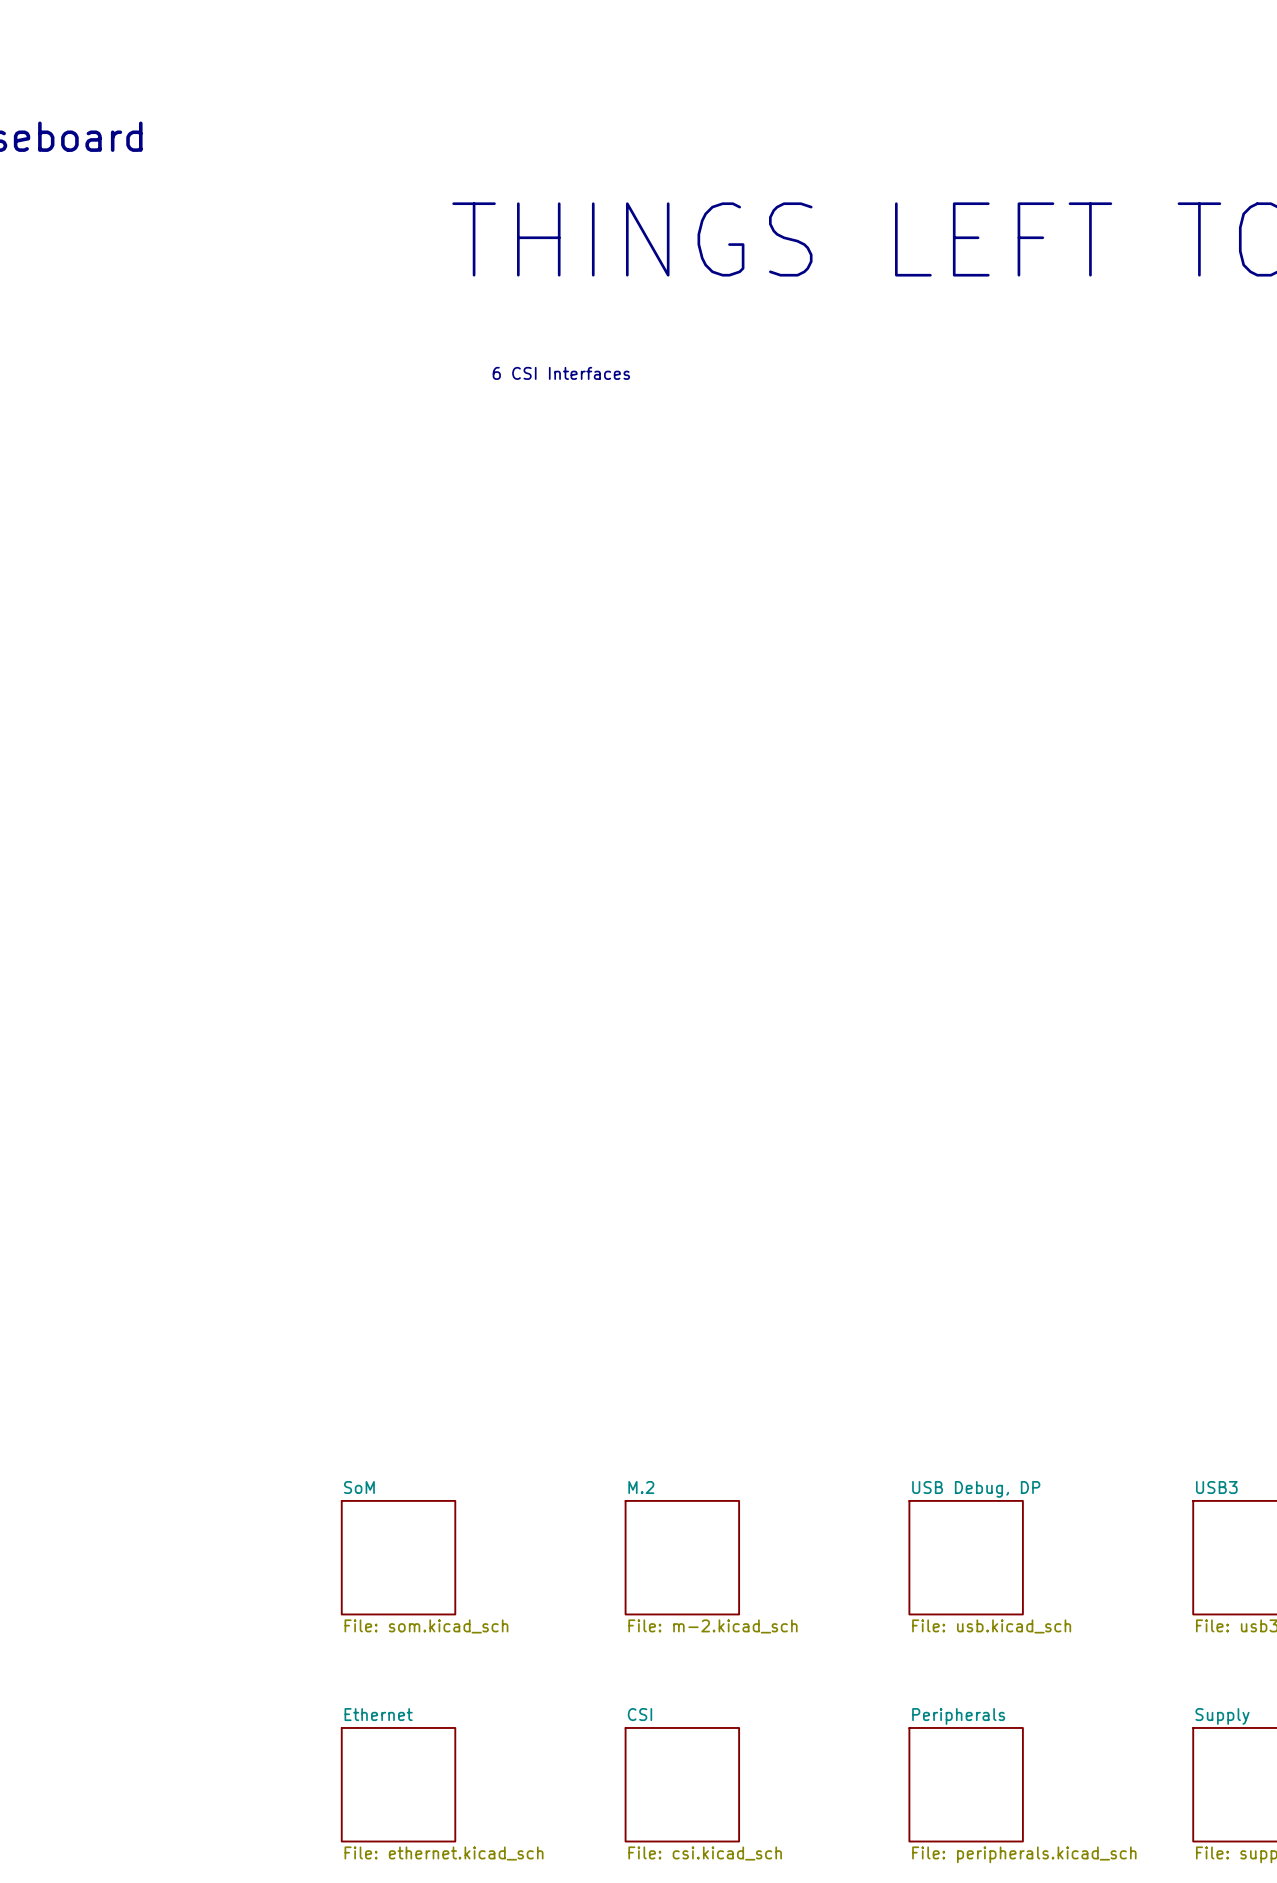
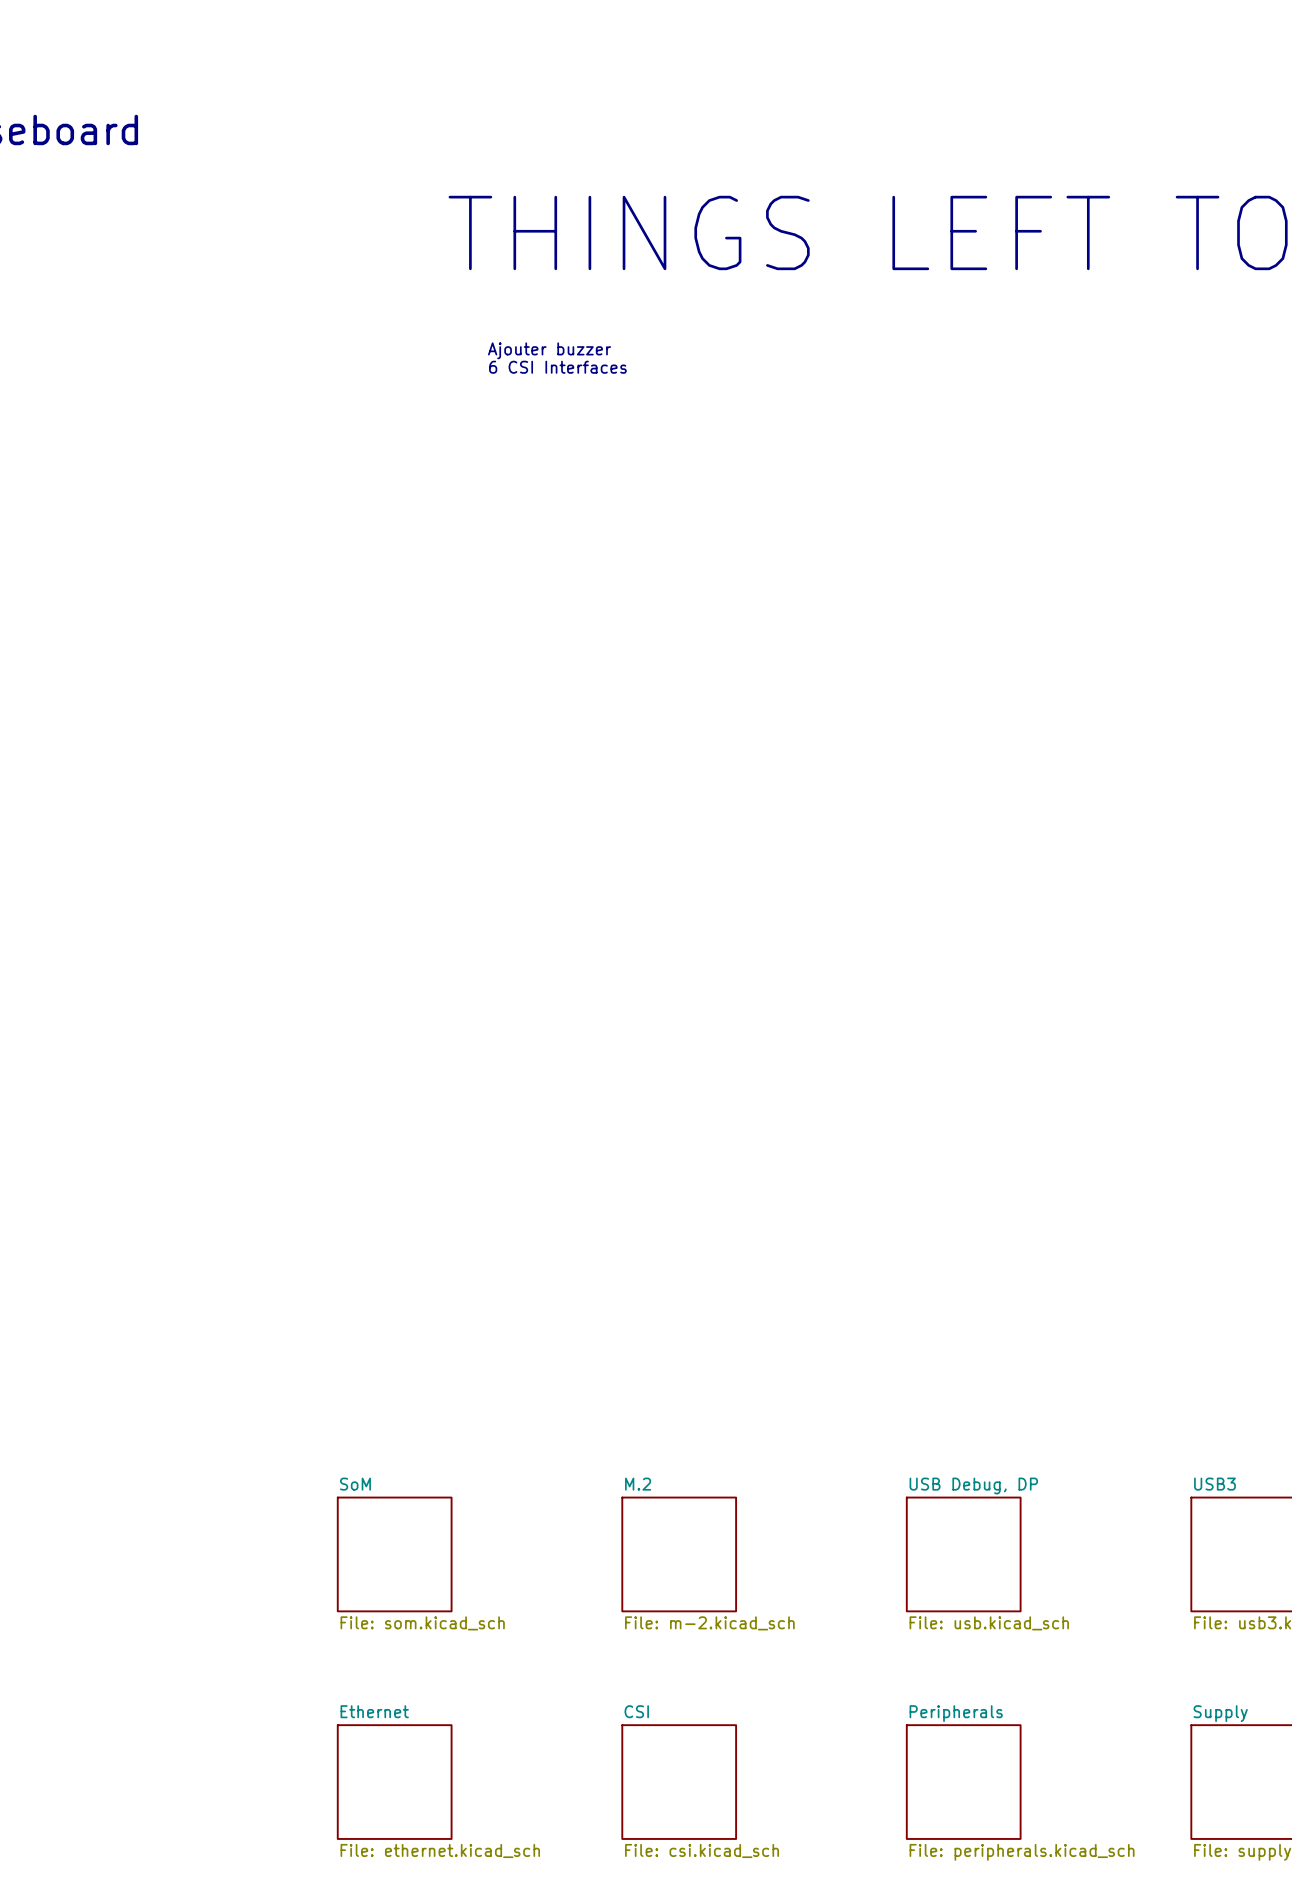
text: none -> Ajouter buzzer (549, 350)

